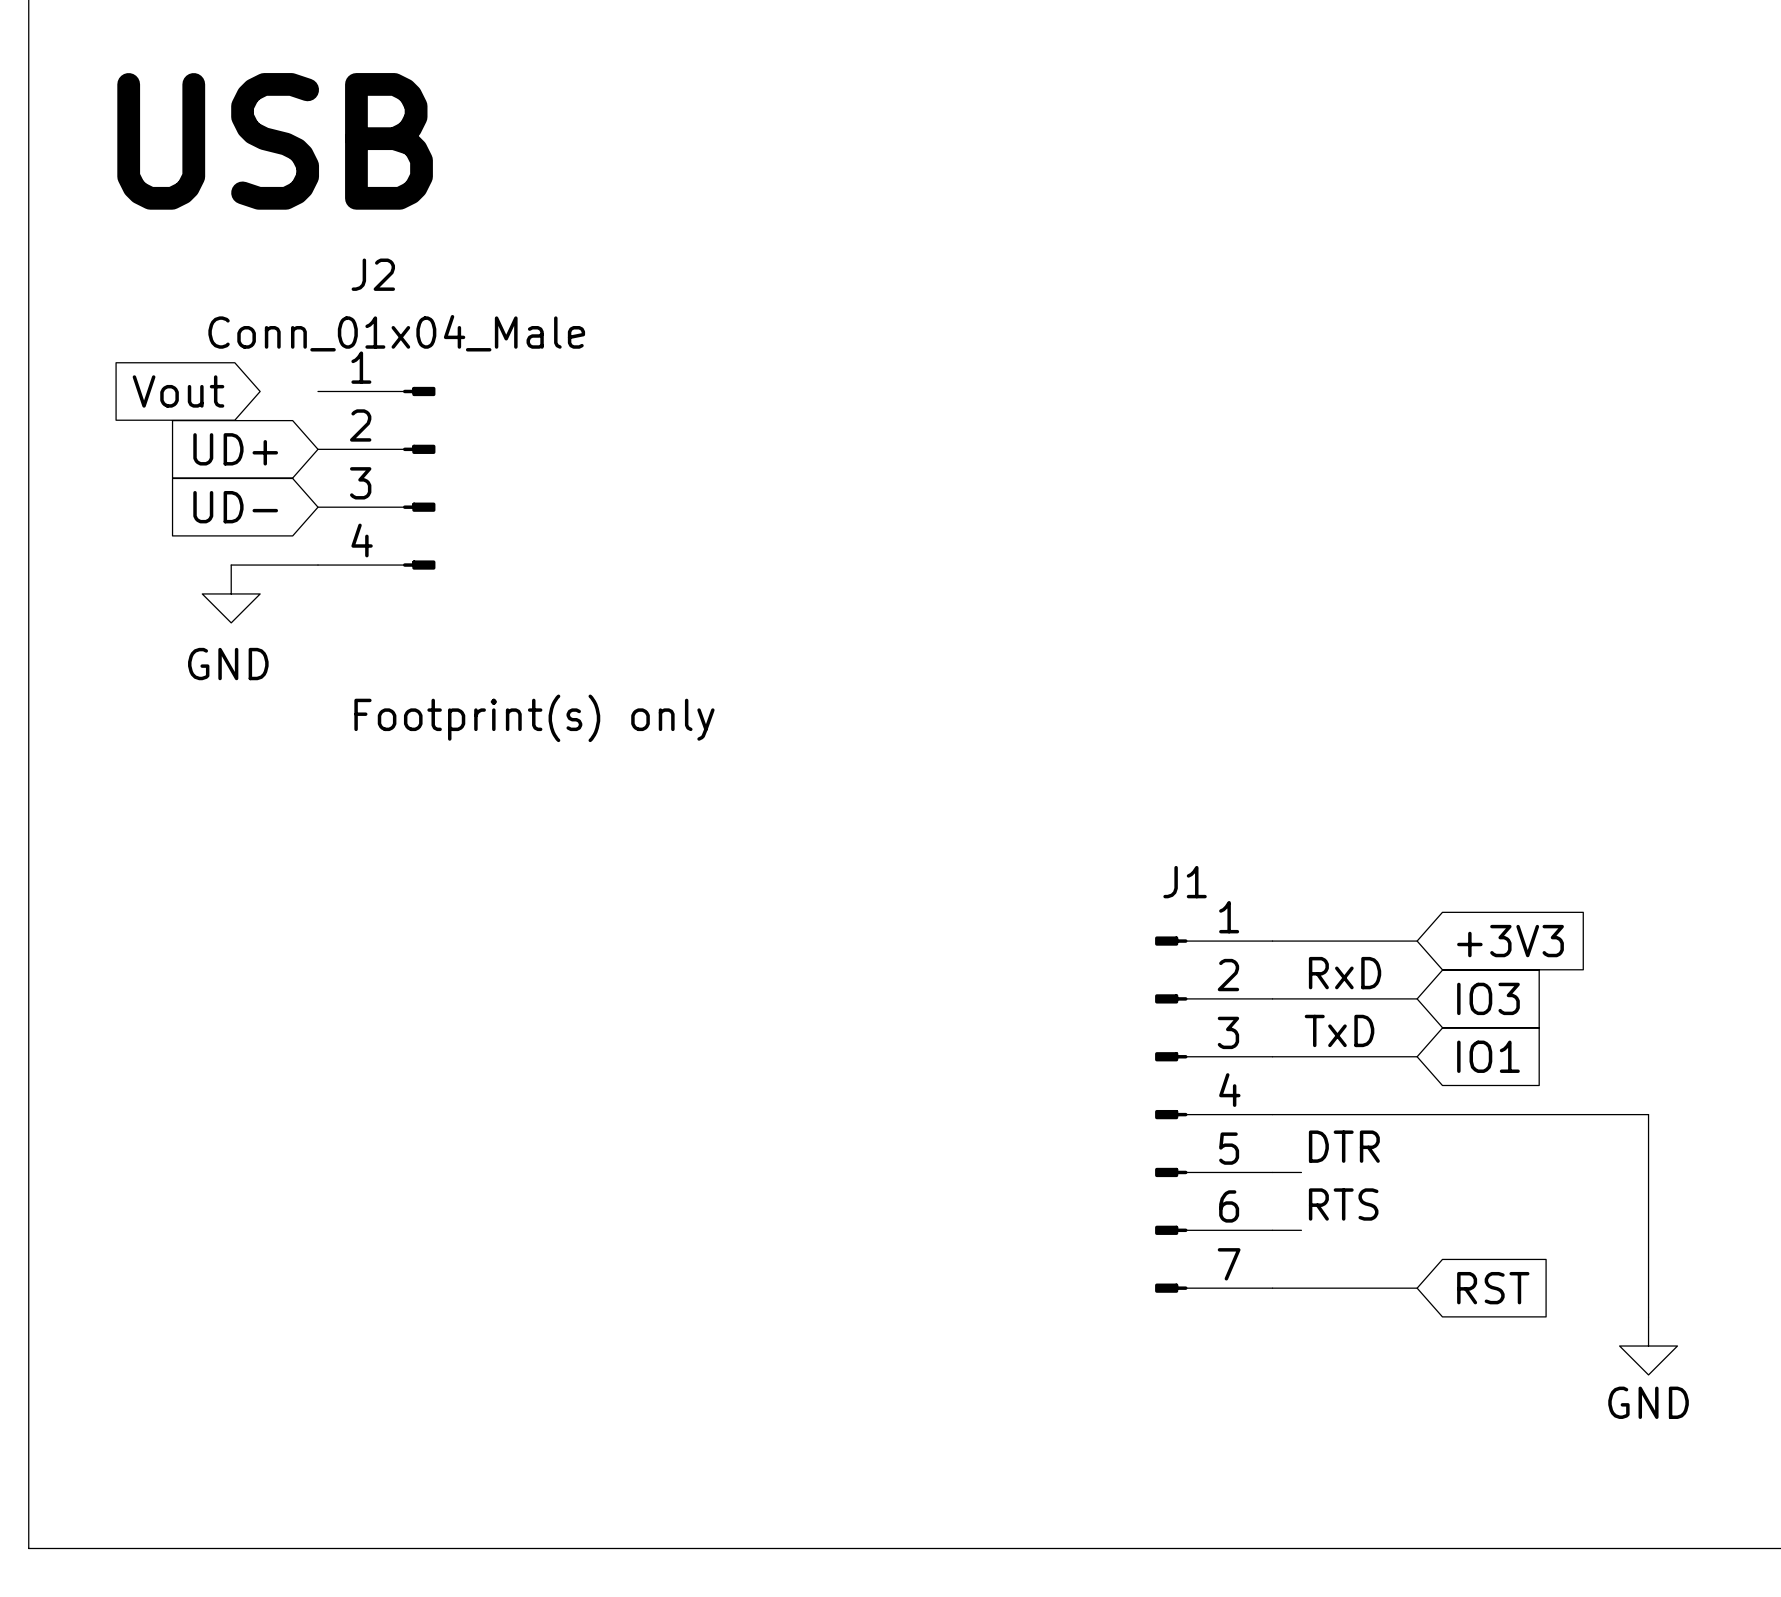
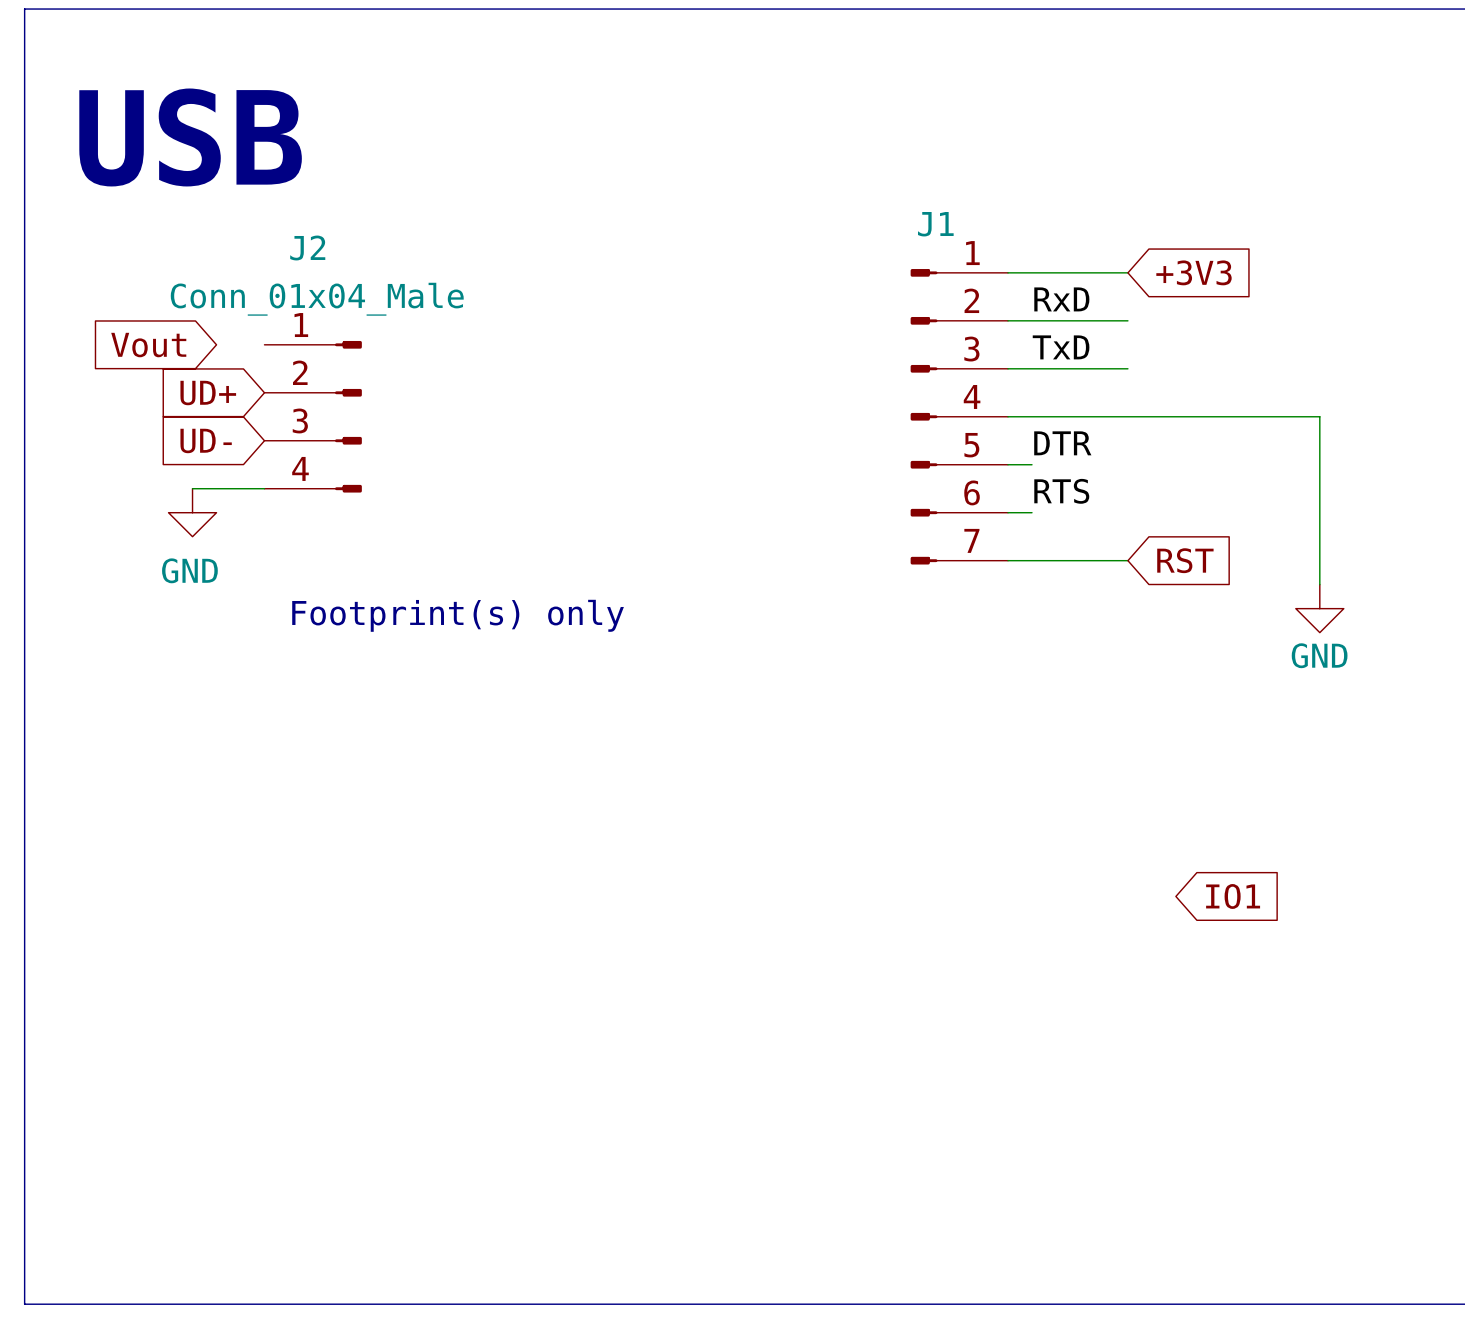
wire: none -> (1008, 272) (1127, 272)
global label: none -> +3V3 (1194, 272)
label: none -> RxD (1061, 299)
wire: none -> (1008, 320) (1127, 320)
label: none -> TxD (1061, 347)
wire: none -> (1008, 368) (1127, 368)
wire: none -> (1008, 416) (1319, 416) (1319, 584)
label: none -> DTR (1062, 443)
wire: none -> (1008, 464) (1031, 464)
label: none -> RTS (1061, 491)
wire: none -> (1008, 512) (1031, 512)
global label: none -> RST (1185, 560)
power symbol: none -> GND (1319, 608)
wire: (1272, 941) (1417, 941) -> (1008, 560) (1127, 560)
global label: +3V3 (1510, 941) -> none
label: RxD (1345, 973) -> none
wire: (1272, 998) (1417, 998) -> none
global label: IO3 (1488, 998) -> none
label: TxD (1339, 1030) -> none
wire: (1272, 1056) (1417, 1056) -> none
J1 position: (1213, 1114) -> (959, 416)
wire: (1272, 1114) (1648, 1114) (1648, 1317) -> none
label: DTR (1344, 1146) -> none
wire: (1272, 1172) (1301, 1172) -> none
label: RTS (1343, 1204) -> none
wire: (1272, 1230) (1301, 1230) -> none
wire: (1272, 1288) (1417, 1288) -> none
global label: RST (1493, 1288) -> none
power symbol: GND (1648, 1346) -> none

